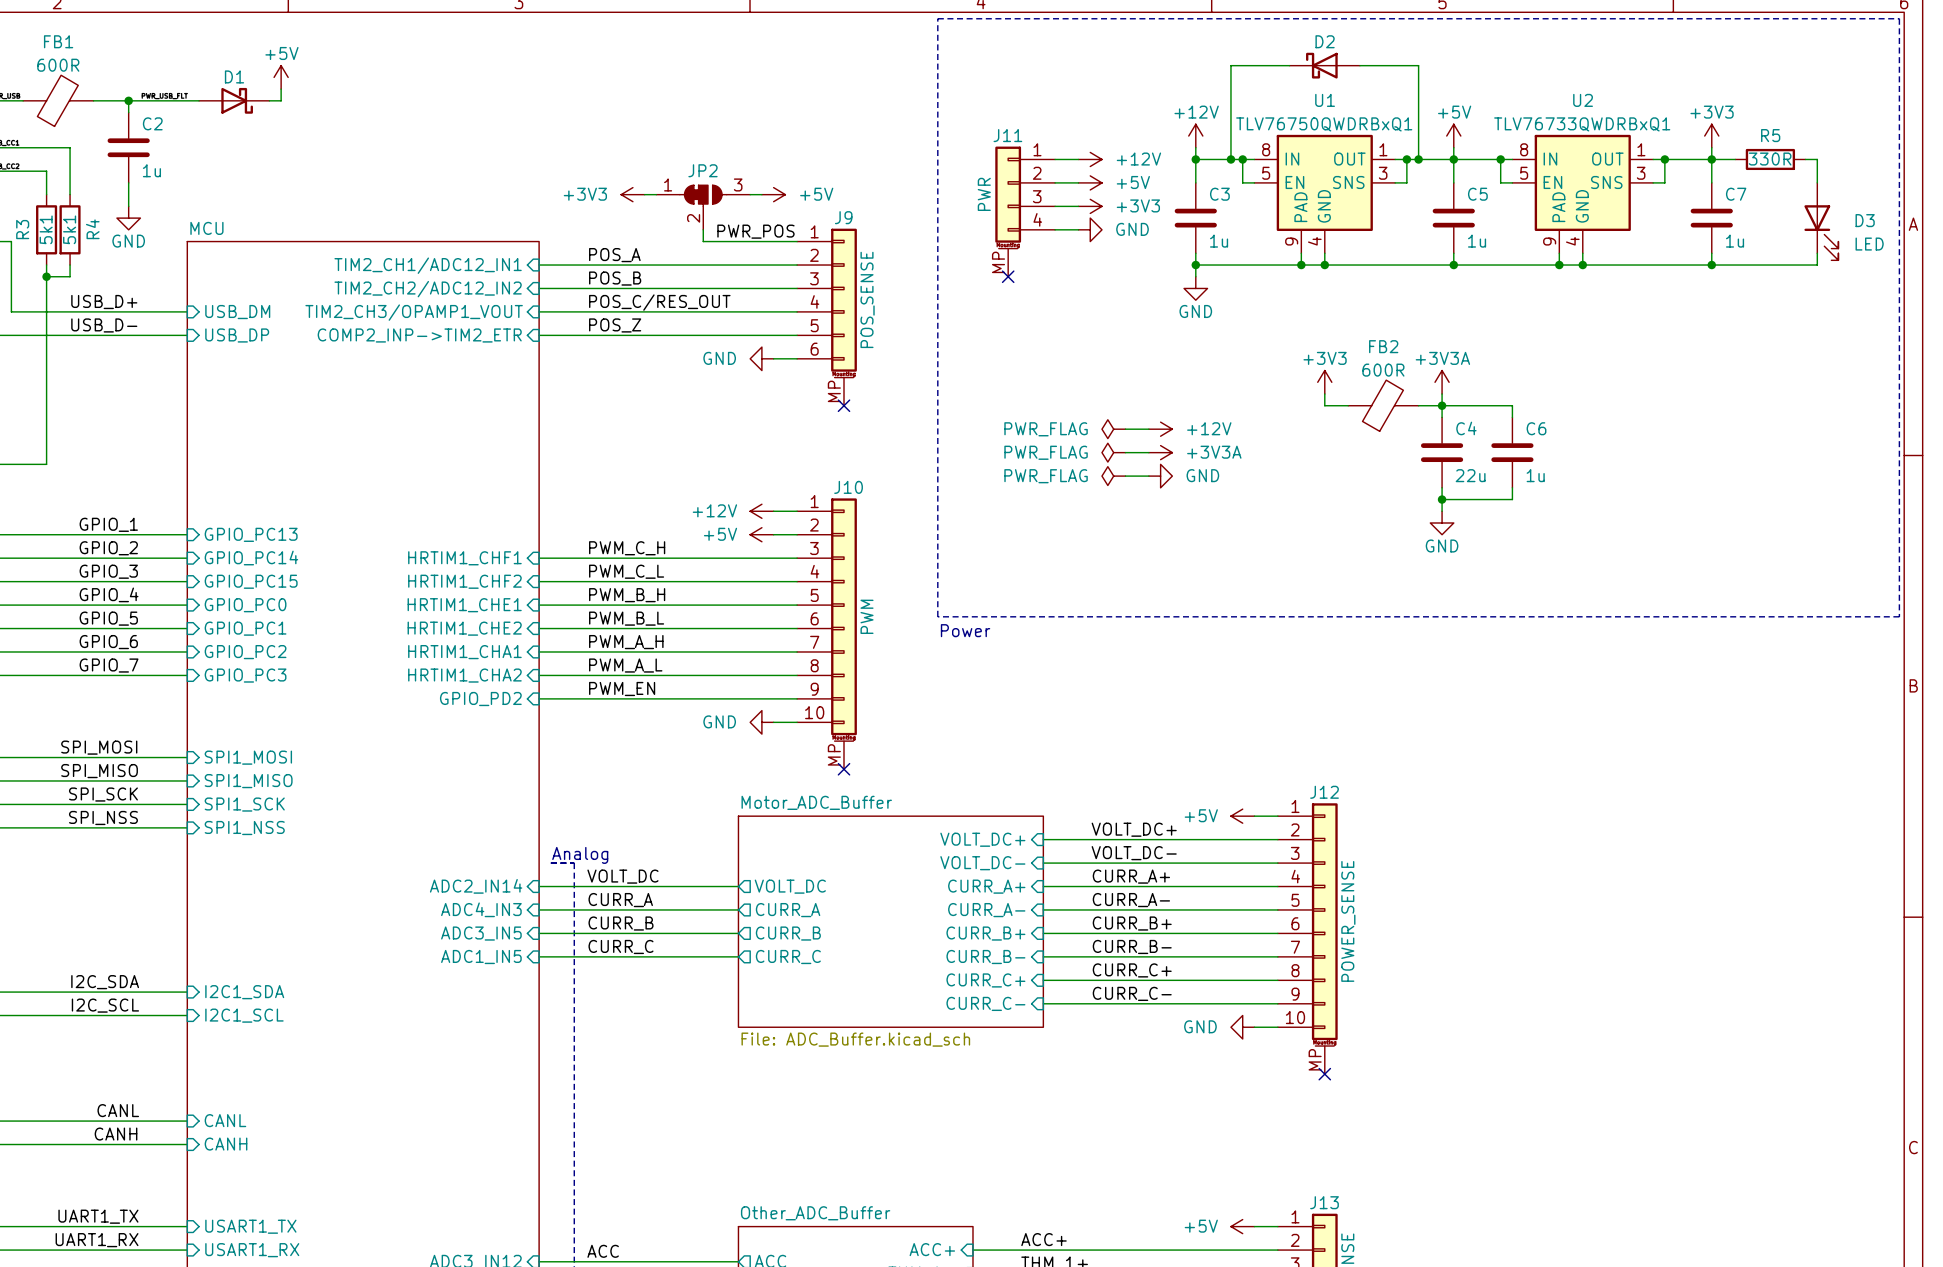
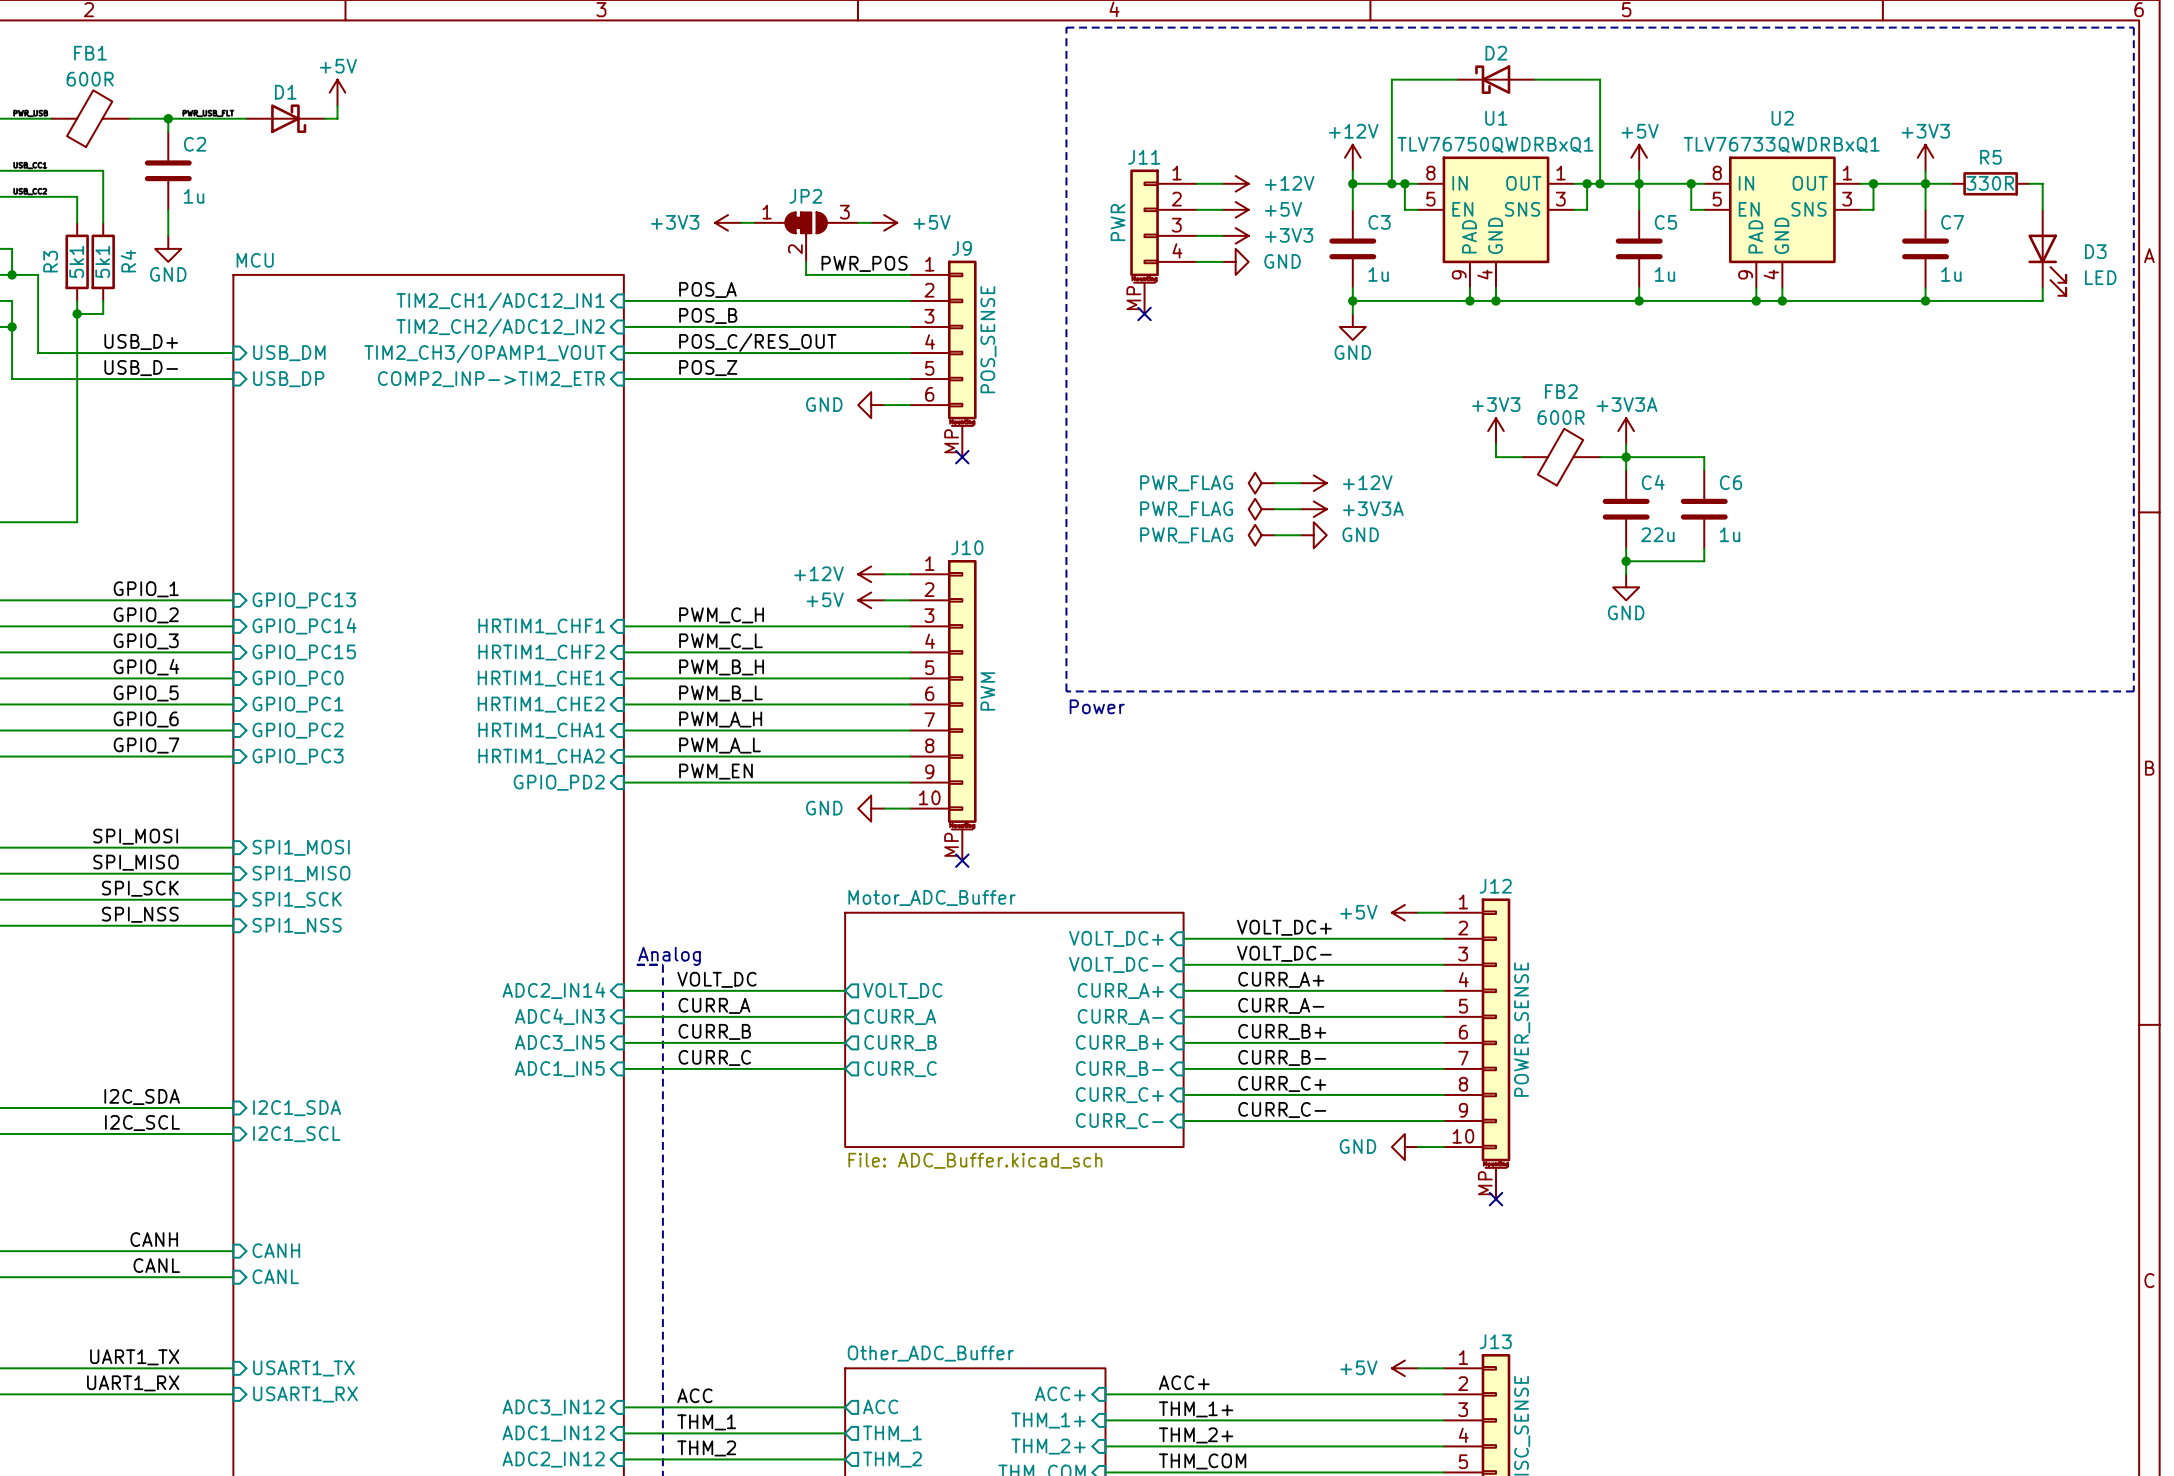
label: CANL (118, 1110) -> CANH (154, 1239)
sheet pin: CANL (225, 1120) -> CANH (276, 1250)
label: CANH (116, 1134) -> CANL (156, 1265)
sheet pin: CANH (226, 1144) -> CANL (275, 1276)

